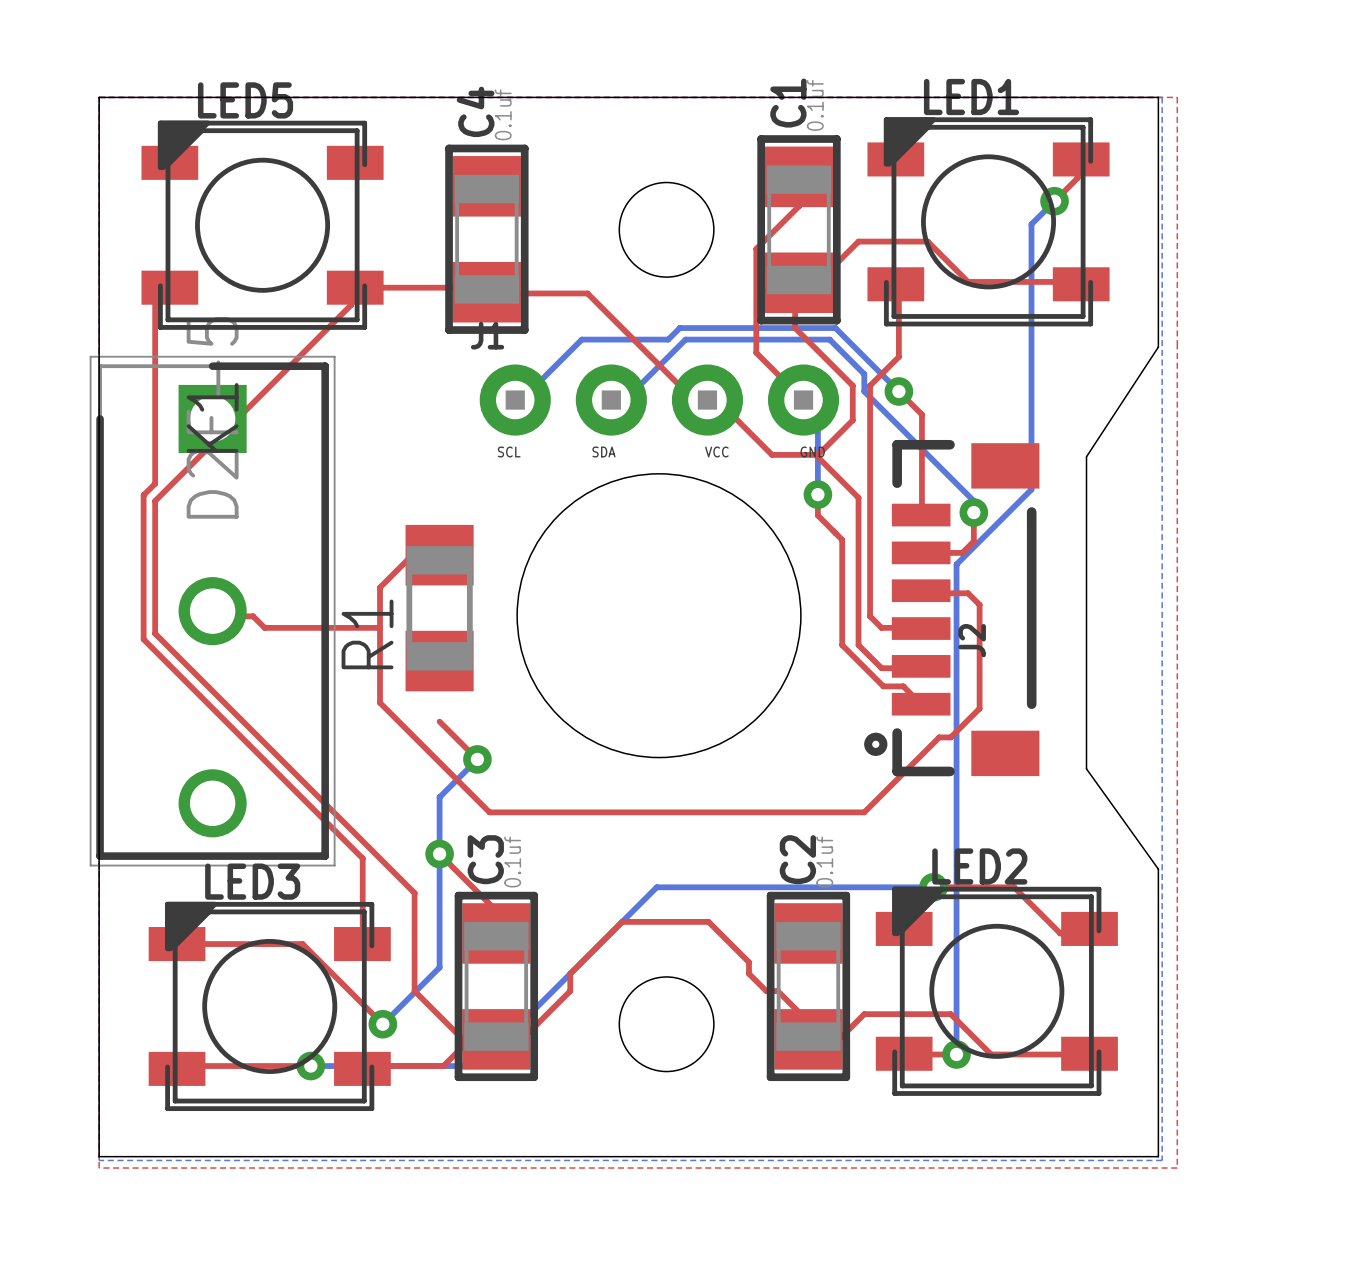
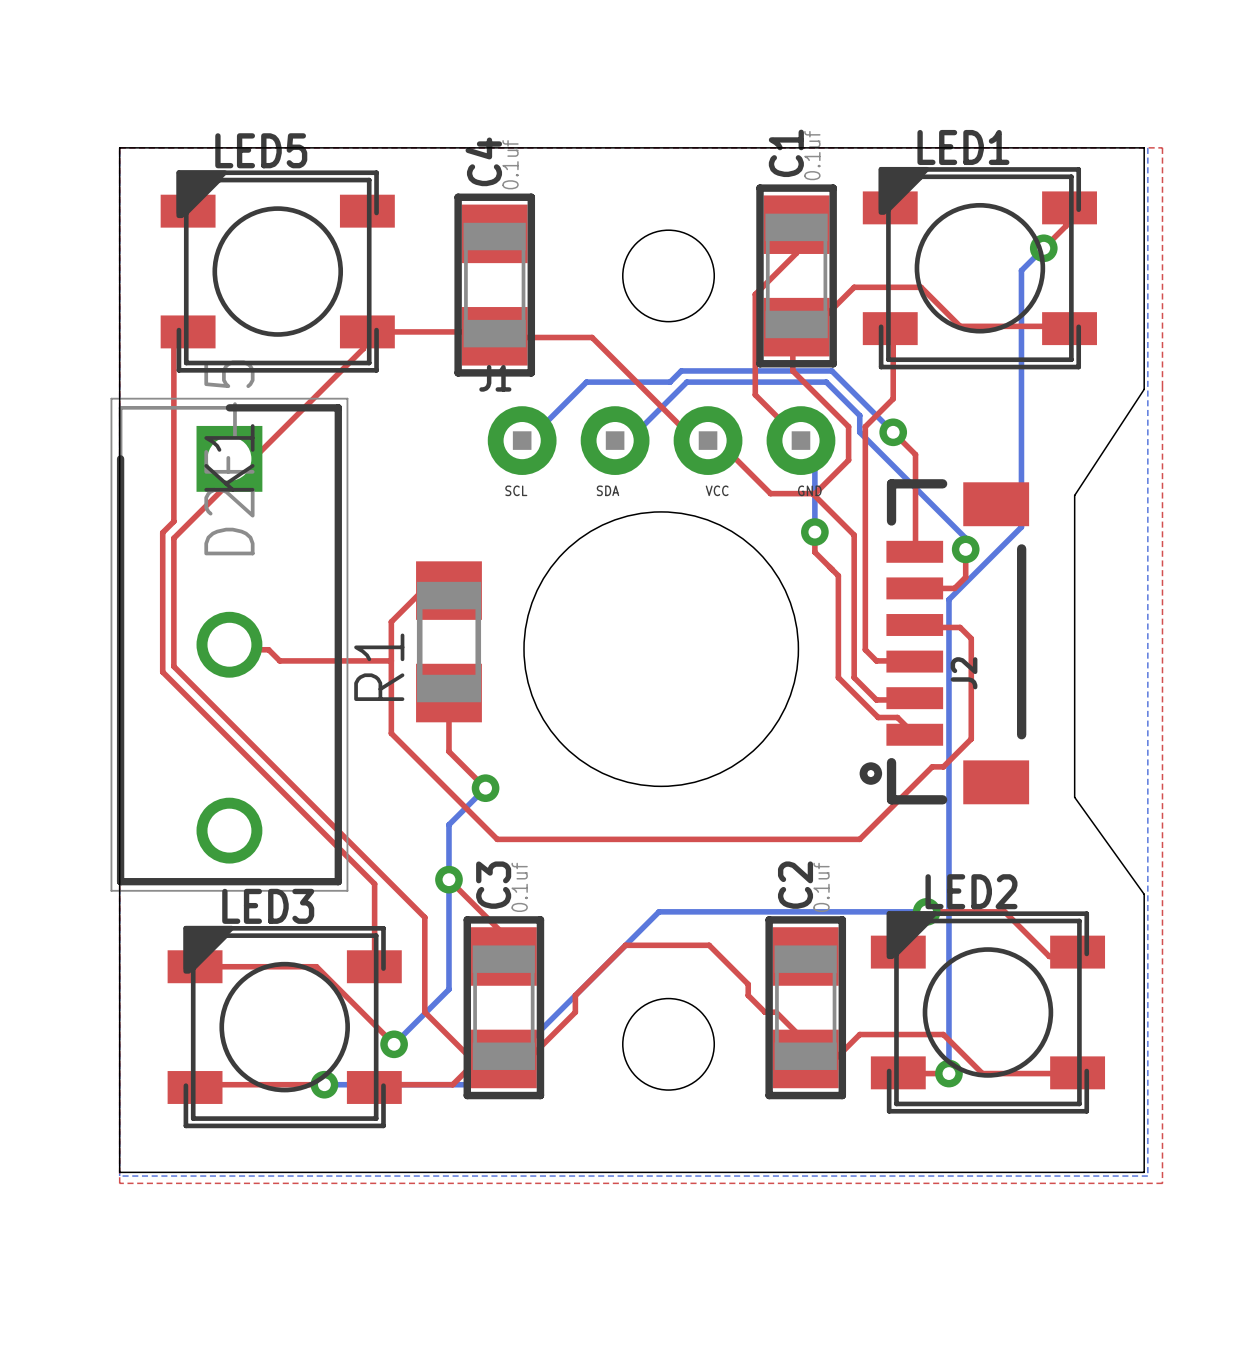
top track: none -> (448, 693) (448, 751)

